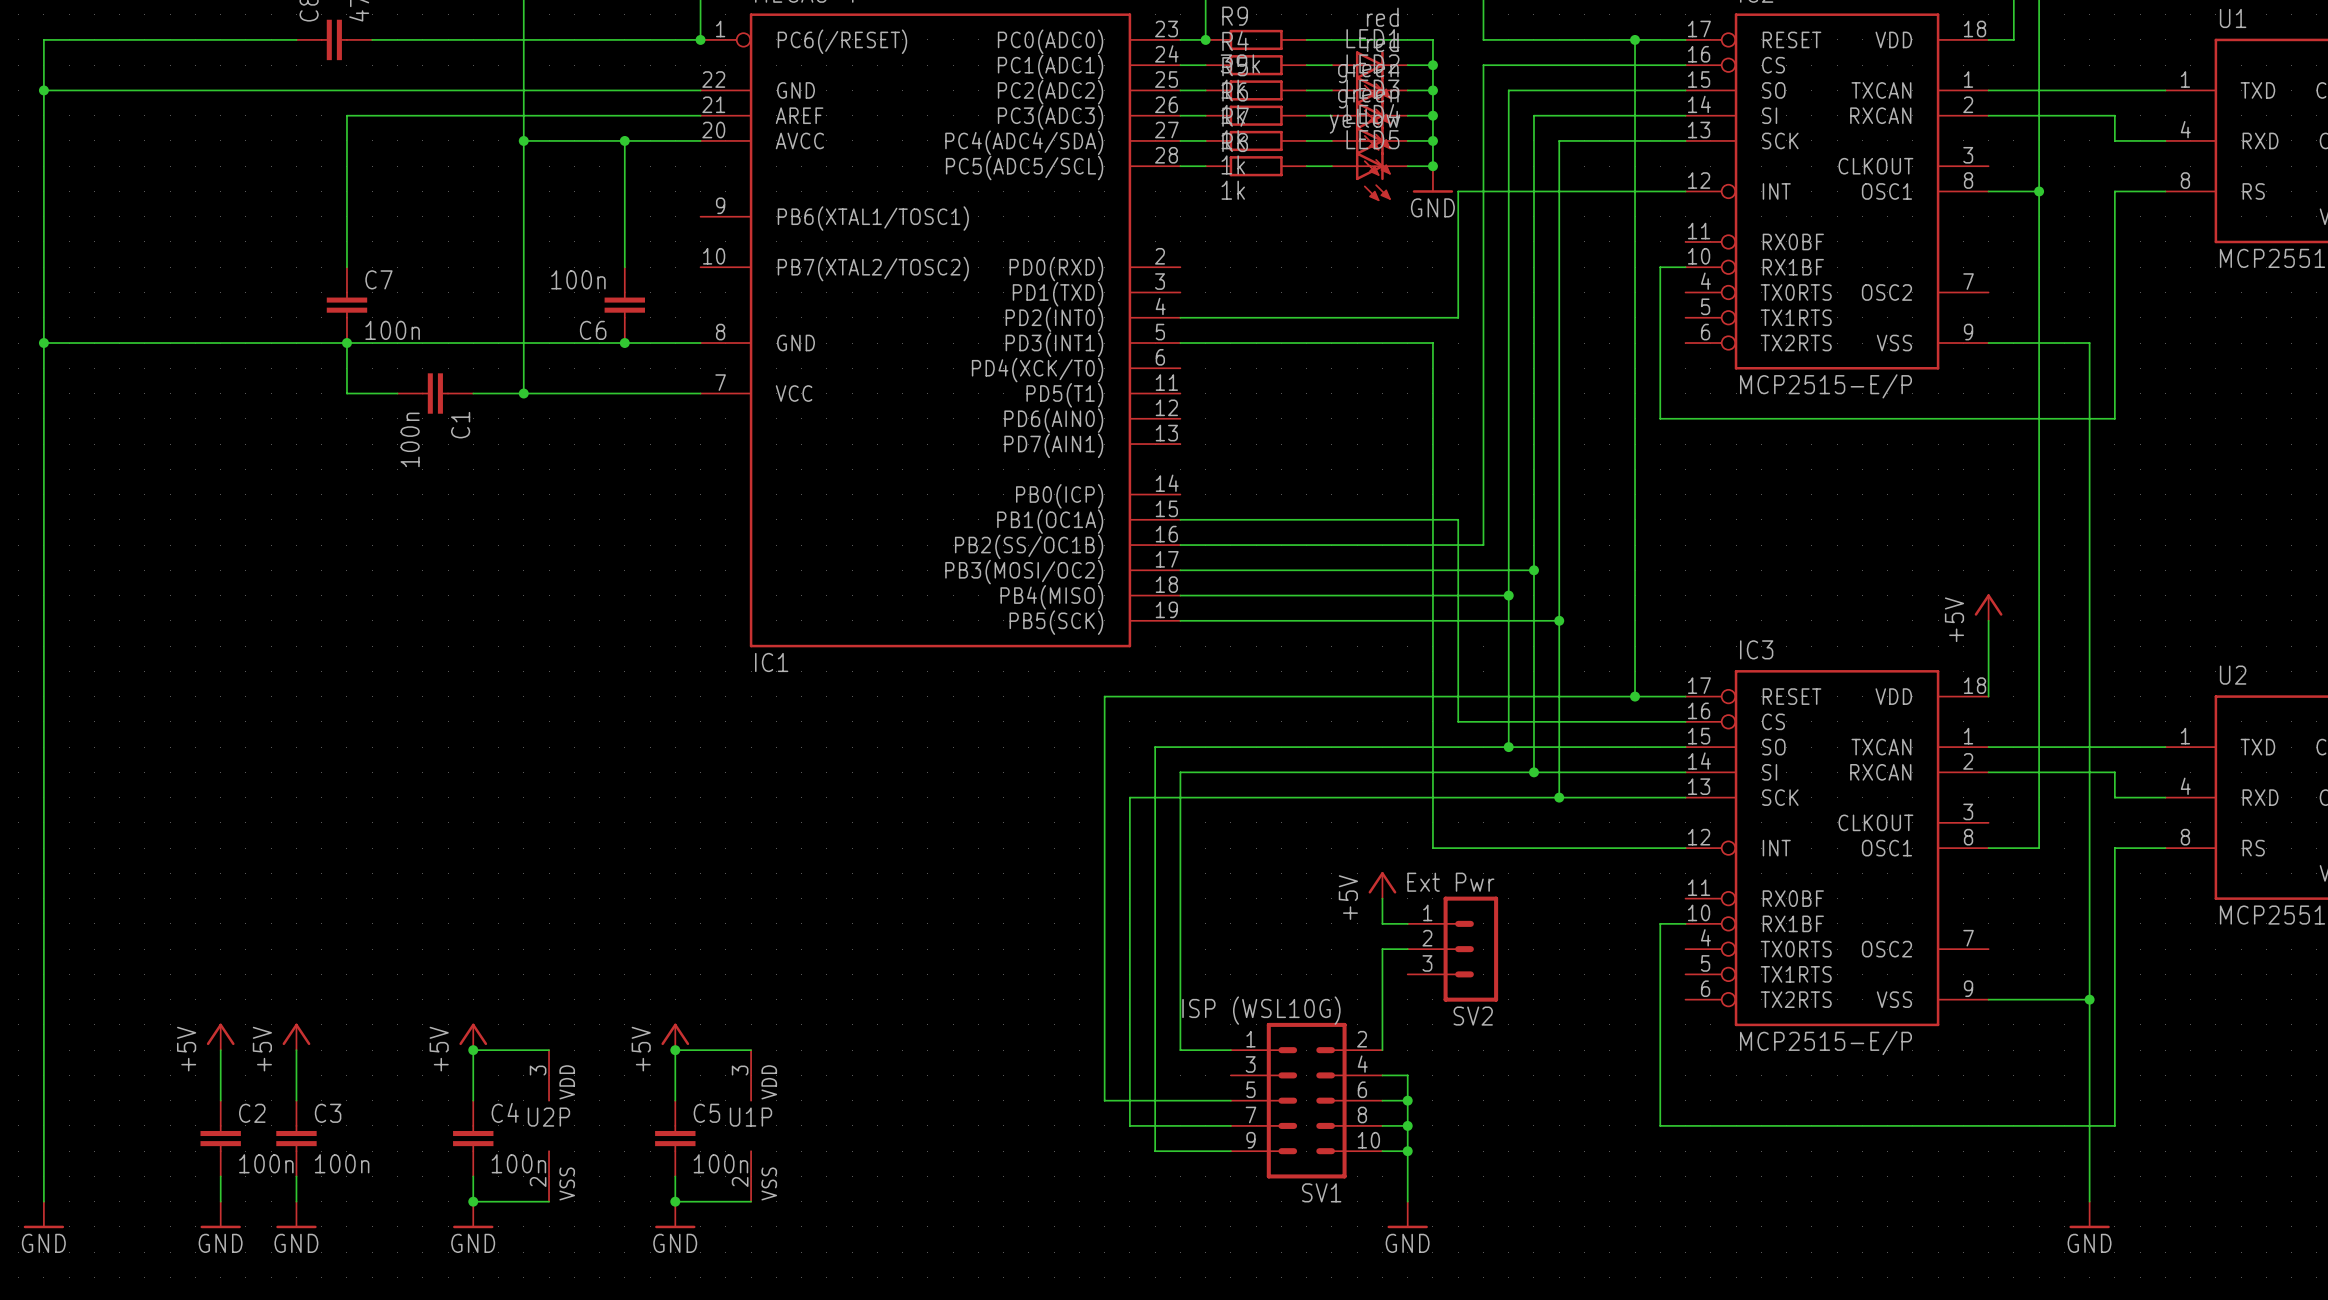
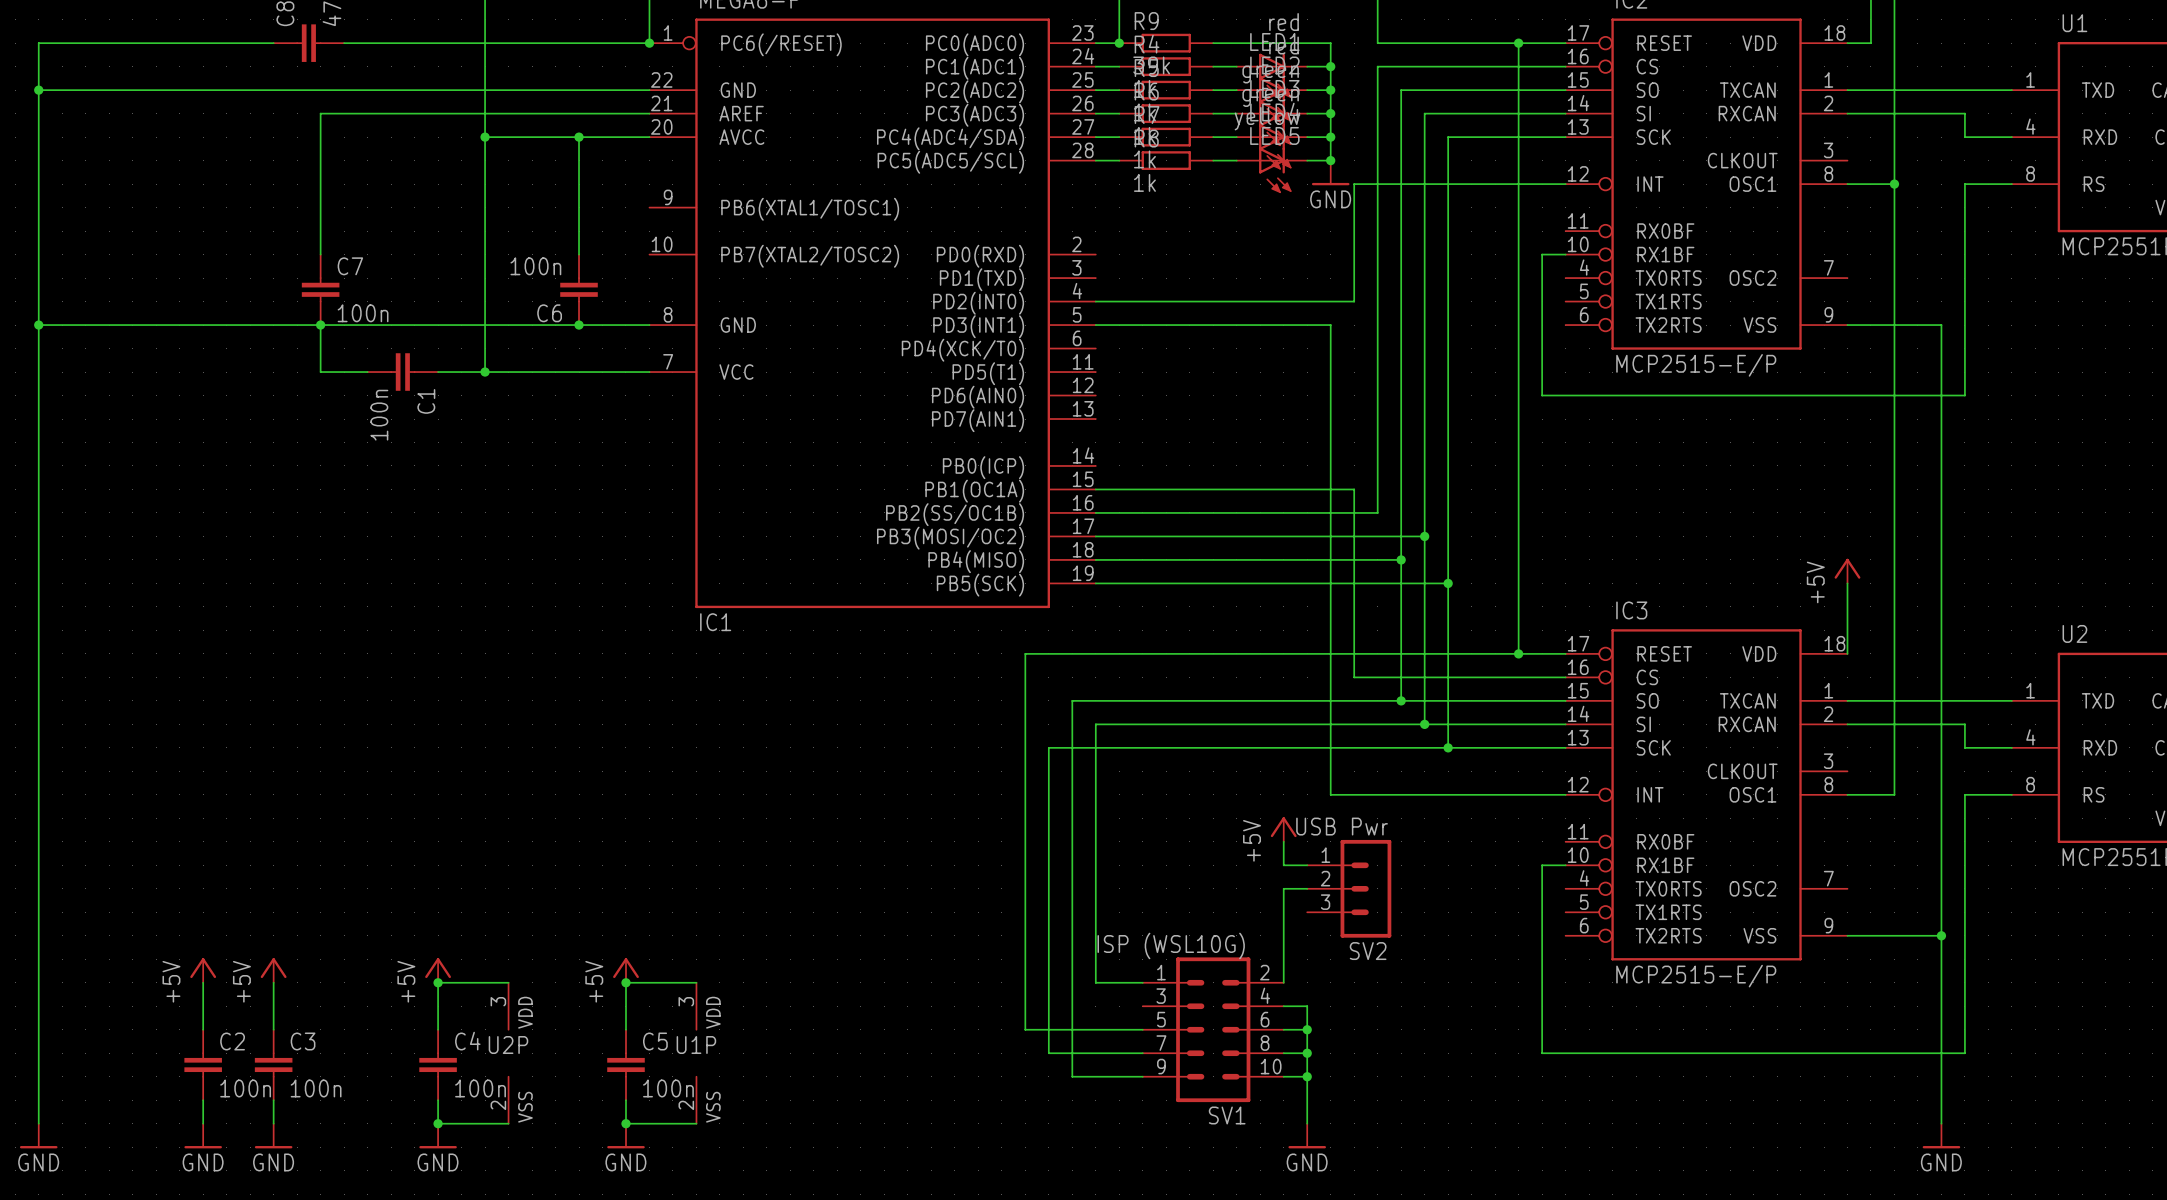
SV2 value: Ext Pwr (1450, 882) -> USB Pwr (1342, 826)

